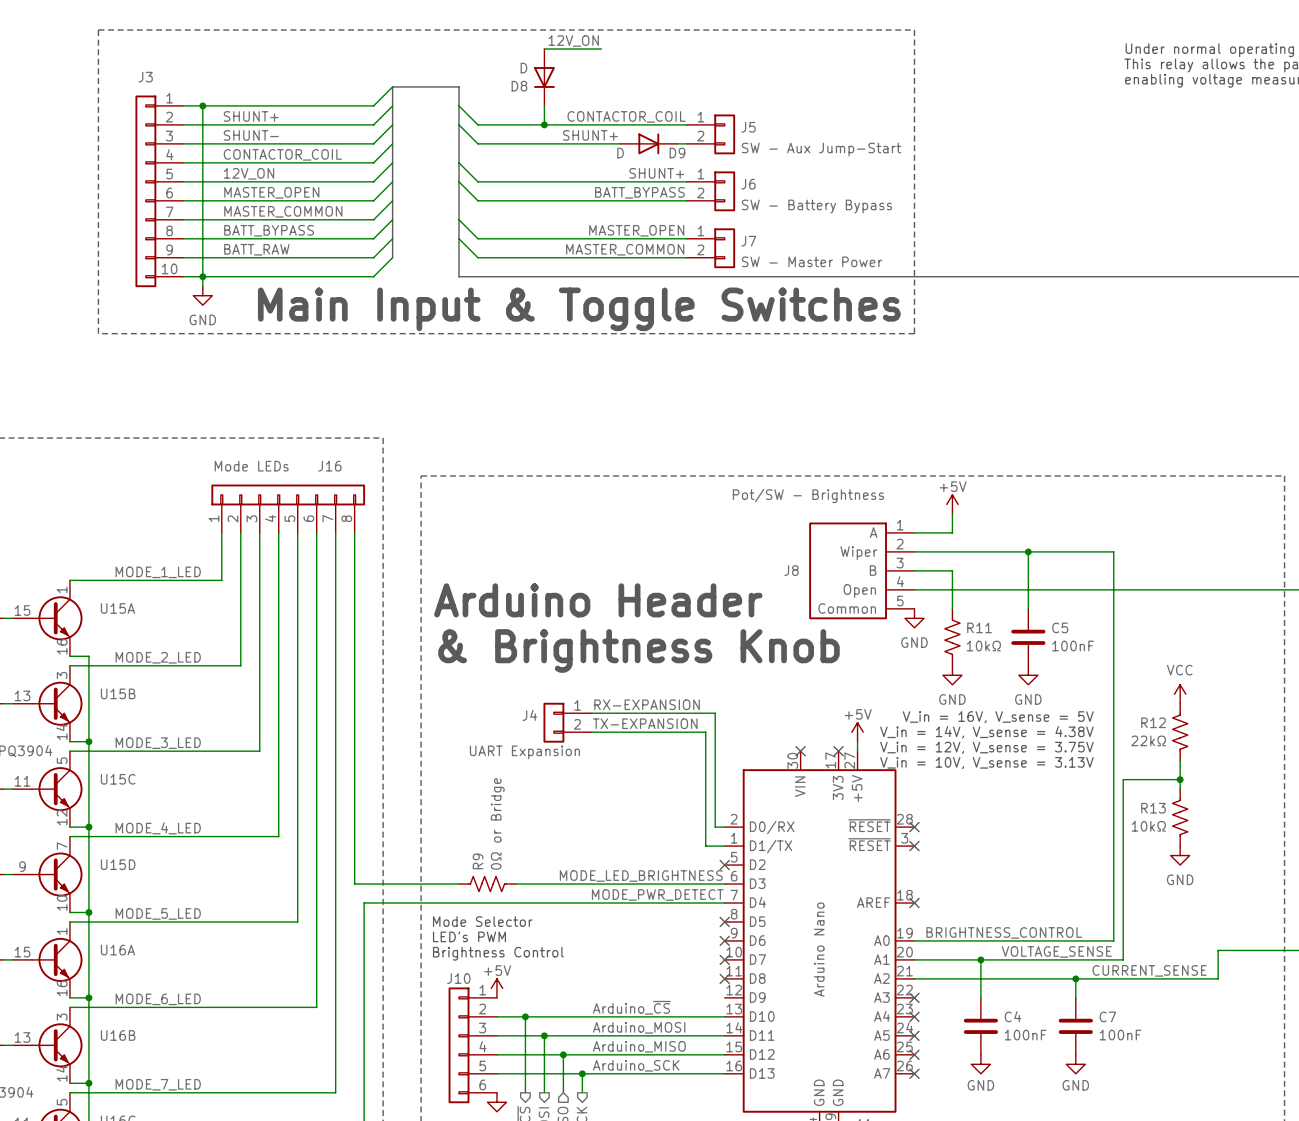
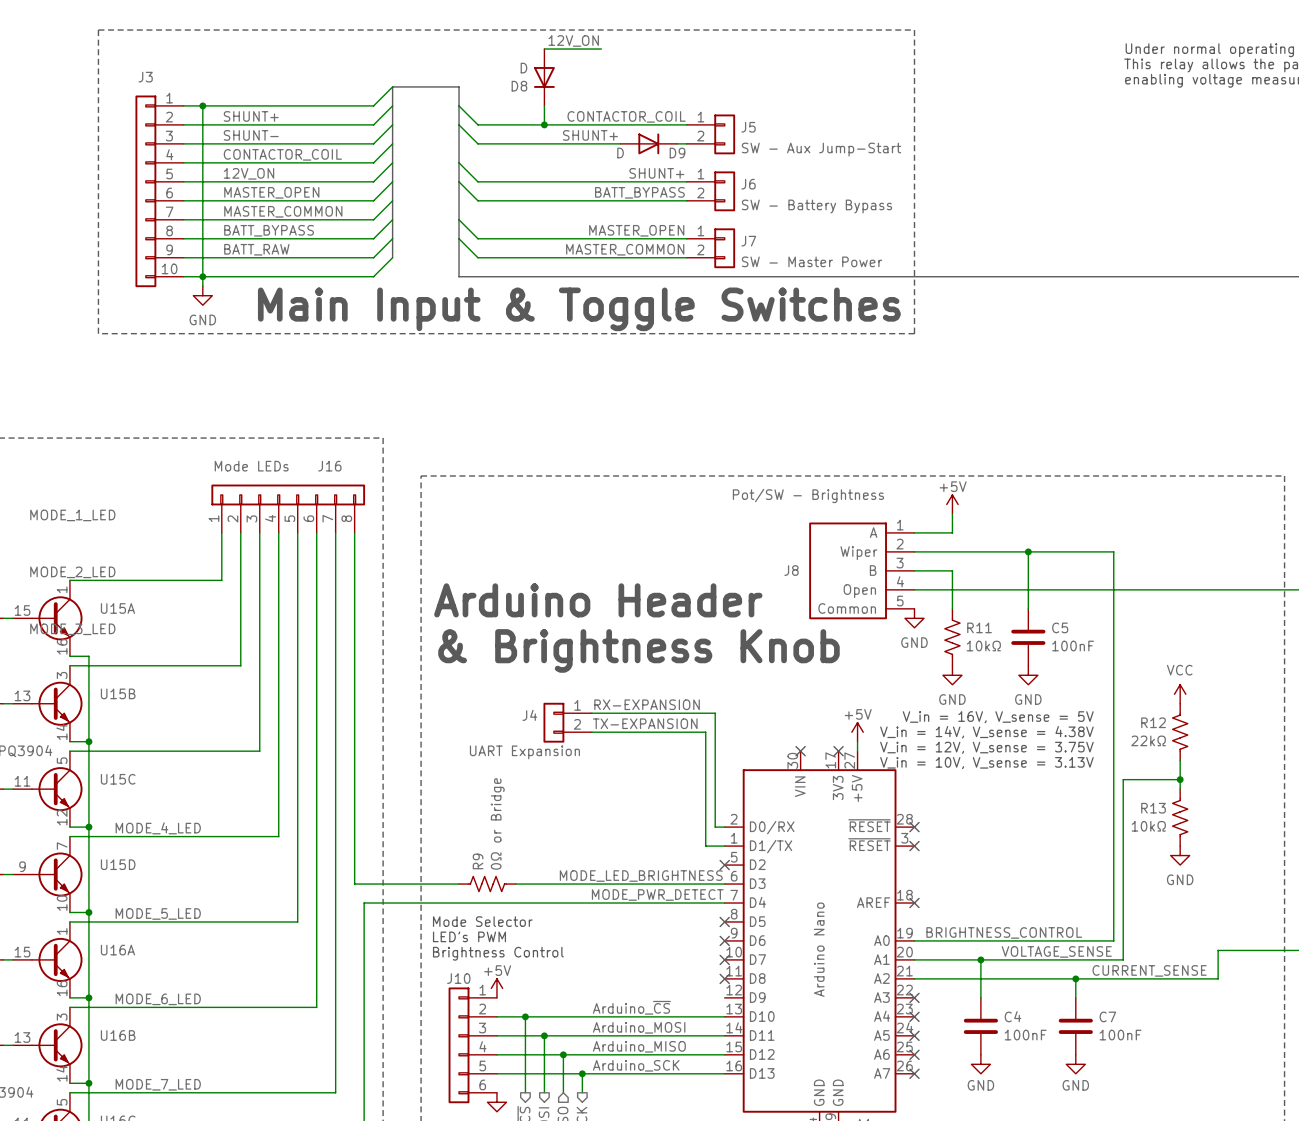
label position: MODE_1_LED (158, 572) -> MODE_1_LED (72, 515)
label position: MODE_2_LED (158, 657) -> MODE_2_LED (72, 572)
label position: MODE_3_LED (158, 743) -> MODE_3_LED (72, 629)

